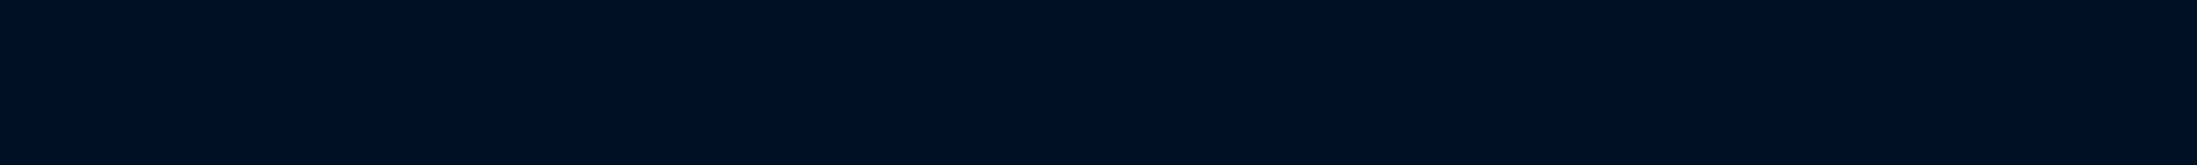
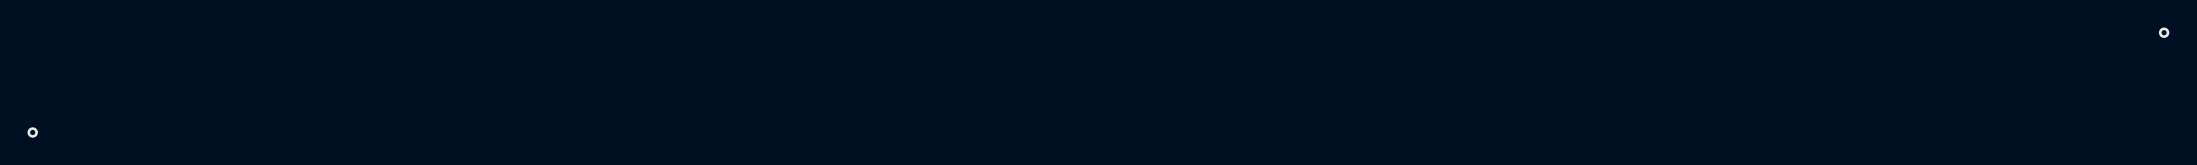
via: none -> (2164, 32)
via: none -> (32, 132)

